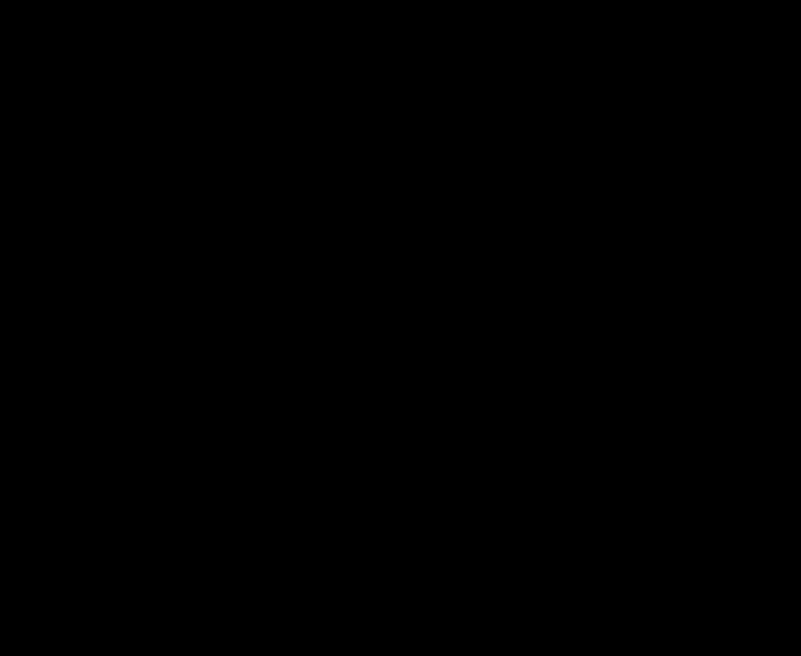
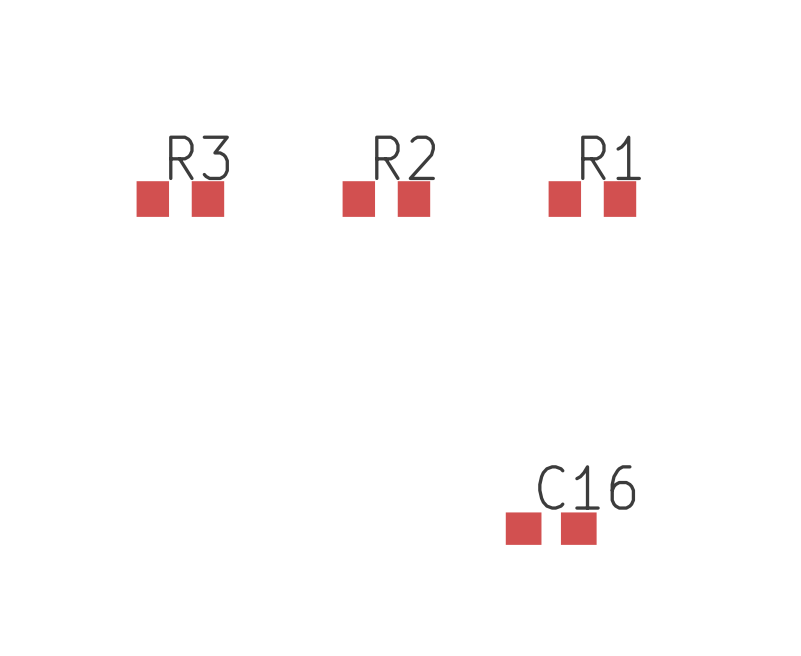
R3: none -> (180, 199)
R2: none -> (386, 199)
R1: none -> (592, 199)
C16: none -> (551, 528)

